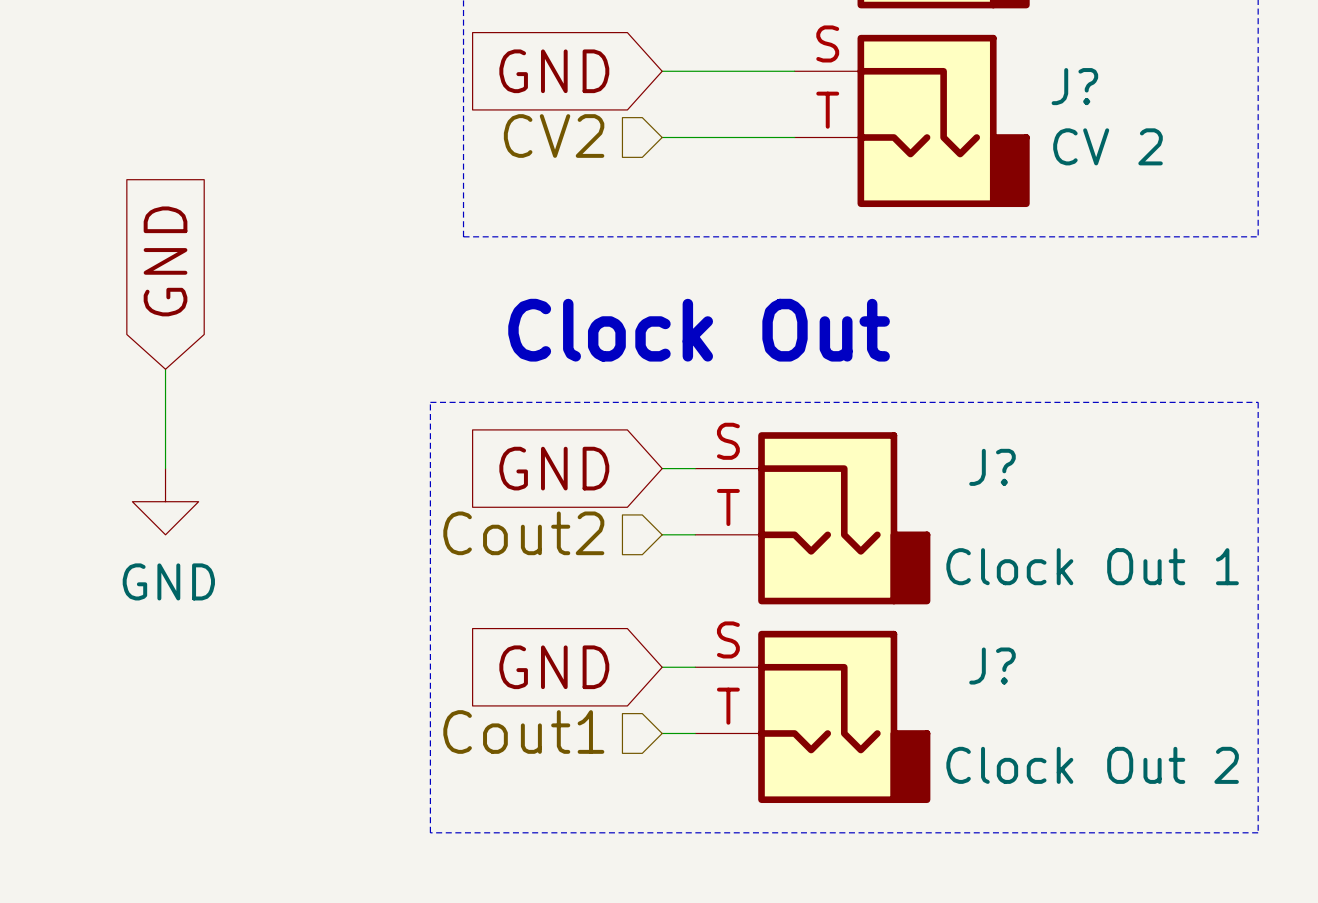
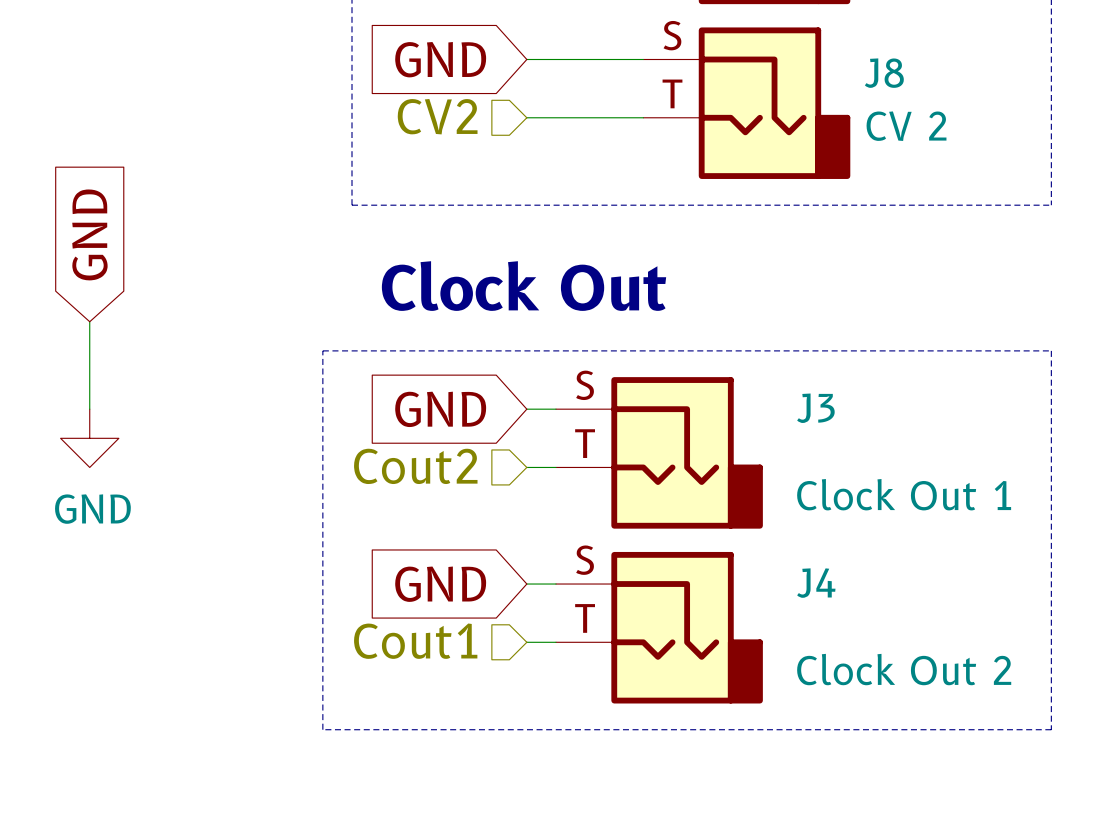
J? name: J? (1074, 86) -> J8 (884, 73)
J? name: J? (992, 467) -> J3 (815, 408)
J? name: J? (992, 666) -> J4 (816, 583)

